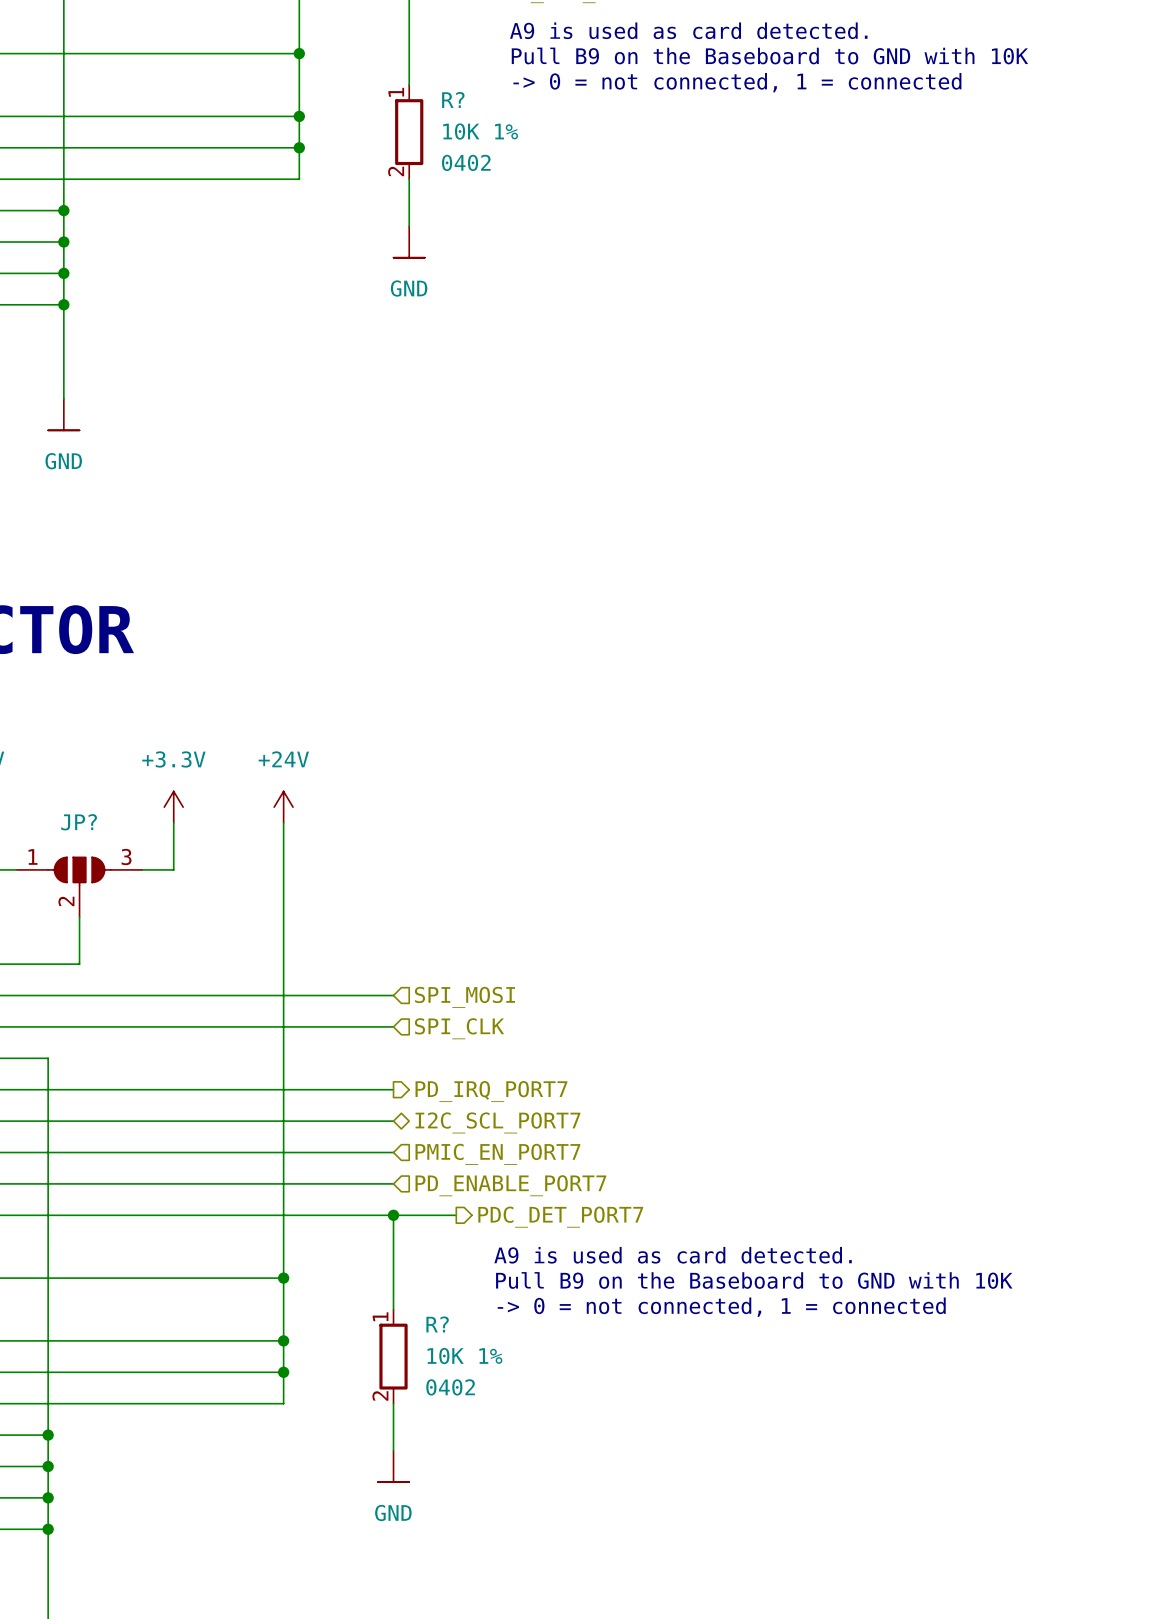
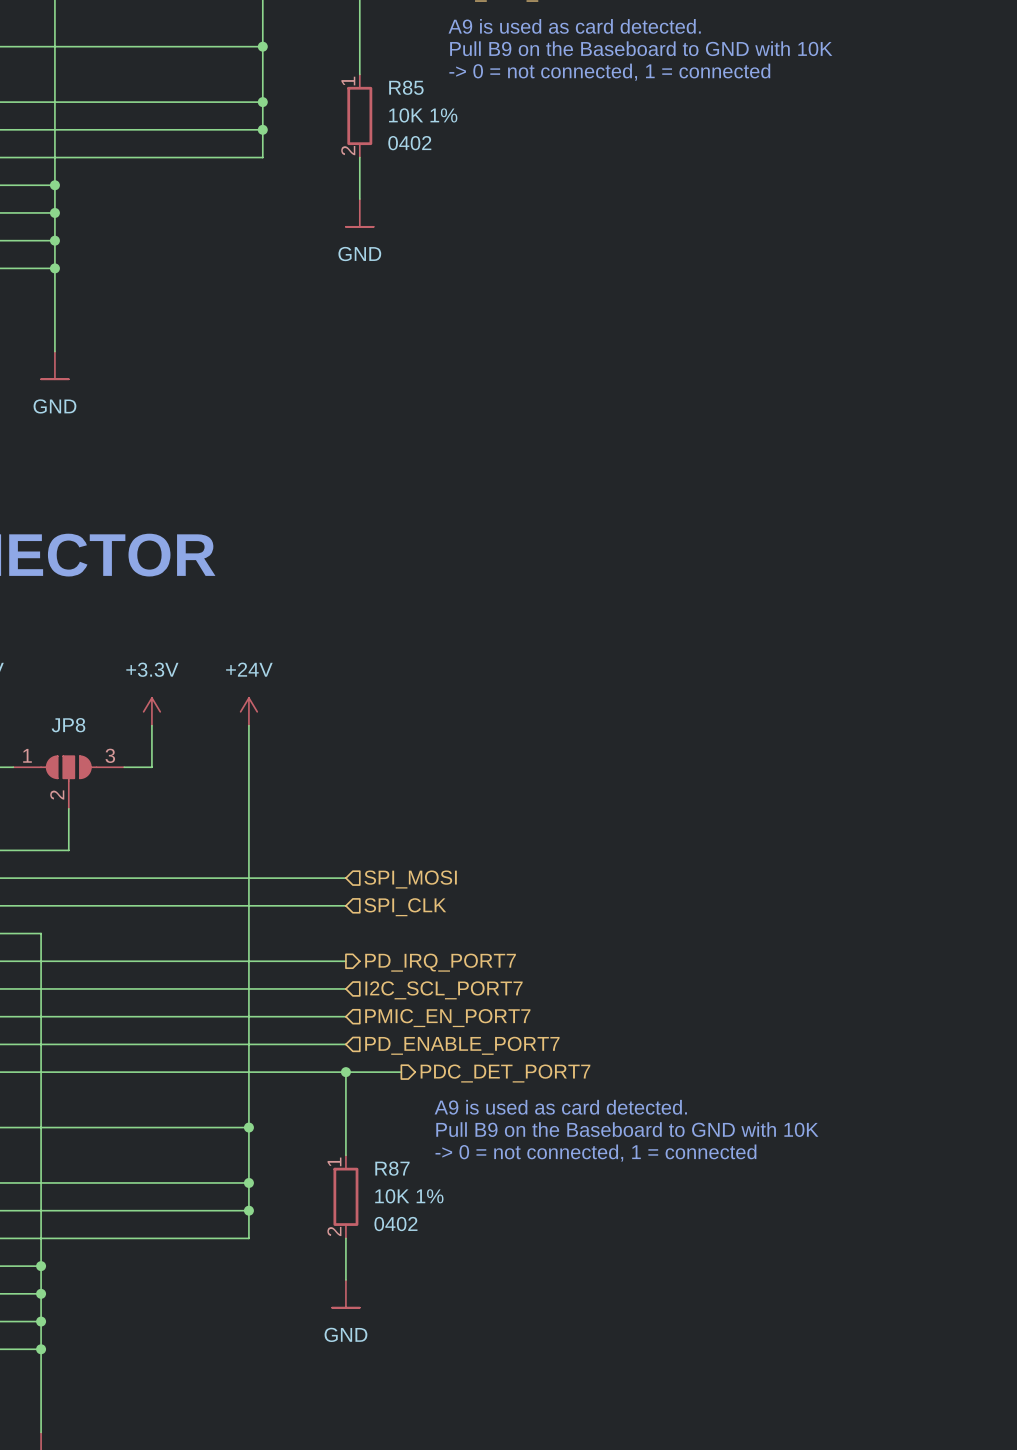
R? name: R? (453, 99) -> R85 (406, 87)
JP? name: JP? (79, 822) -> JP8 (68, 725)
hierarchical label shape: bidirectional (497, 1122) -> input (444, 990)
R? name: R? (437, 1324) -> R87 (392, 1168)

